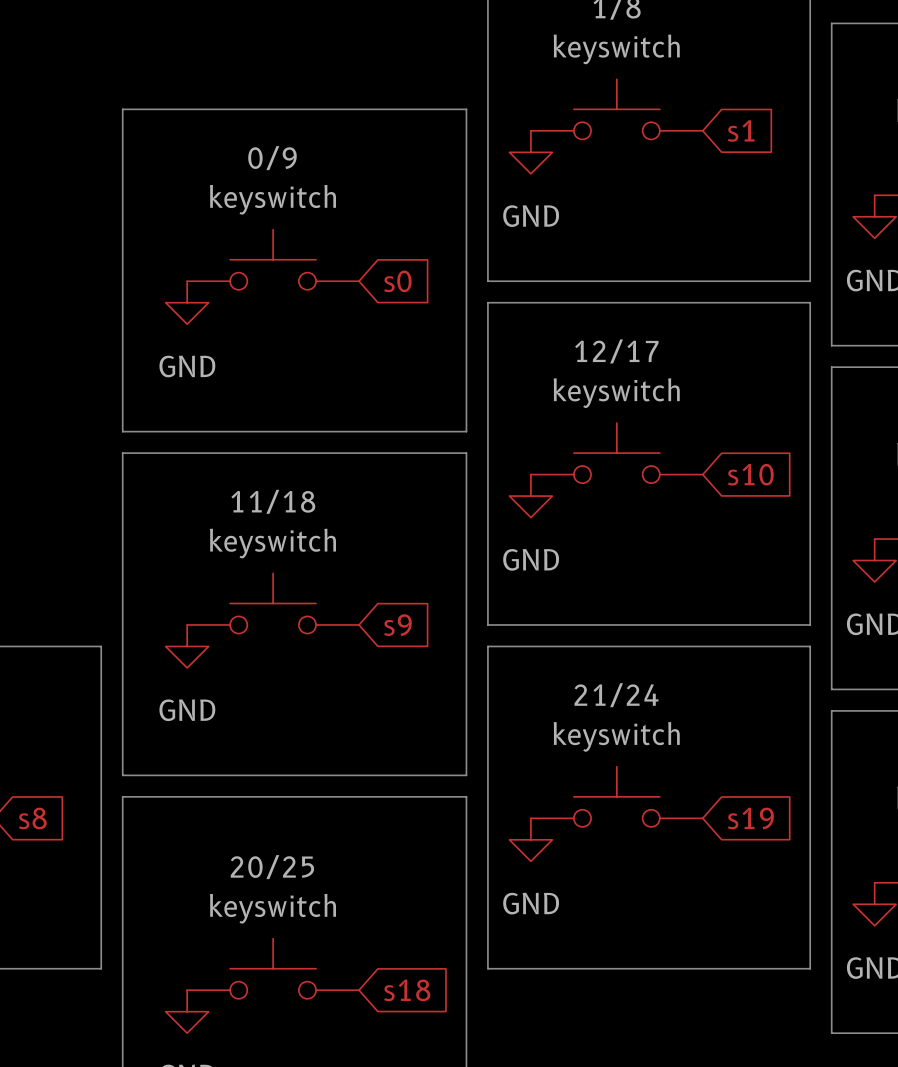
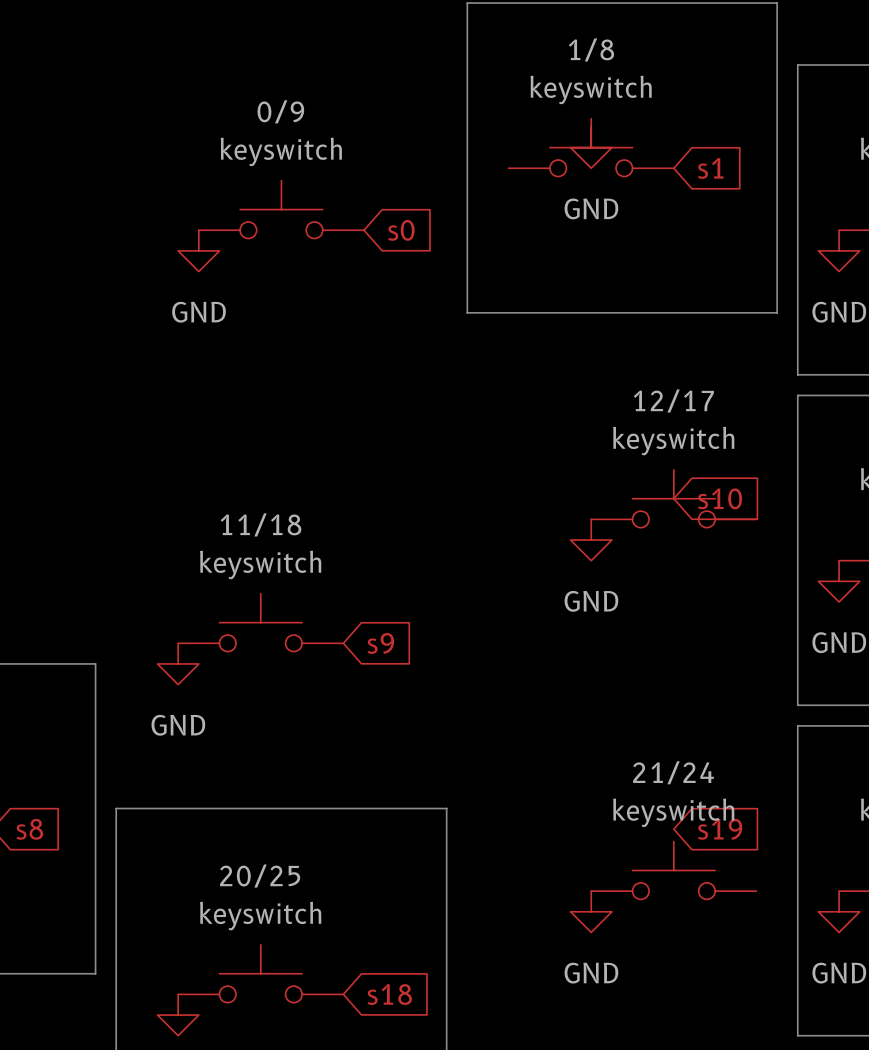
line: (122, 109) (122, 431) (466, 431) (466, 109) (122, 109) -> none
power symbol position: GND (530, 152) -> GND (591, 147)
0/9 position: (273, 259) -> (281, 209)
global label position: s0 (397, 281) -> s0 (401, 230)
power symbol position: GND (187, 302) -> GND (198, 250)
line: (487, 302) (487, 624) (810, 624) (810, 302) (487, 302) -> none
line: (122, 453) (466, 453) (466, 775) (122, 775) (122, 453) -> none
12/17 position: (616, 453) -> (673, 498)
power symbol position: GND (530, 496) -> GND (591, 540)
line: (487, 646) (487, 968) (810, 968) (810, 646) (487, 646) -> none
21/24 position: (616, 796) -> (673, 870)
power symbol position: GND (530, 839) -> GND (591, 911)

